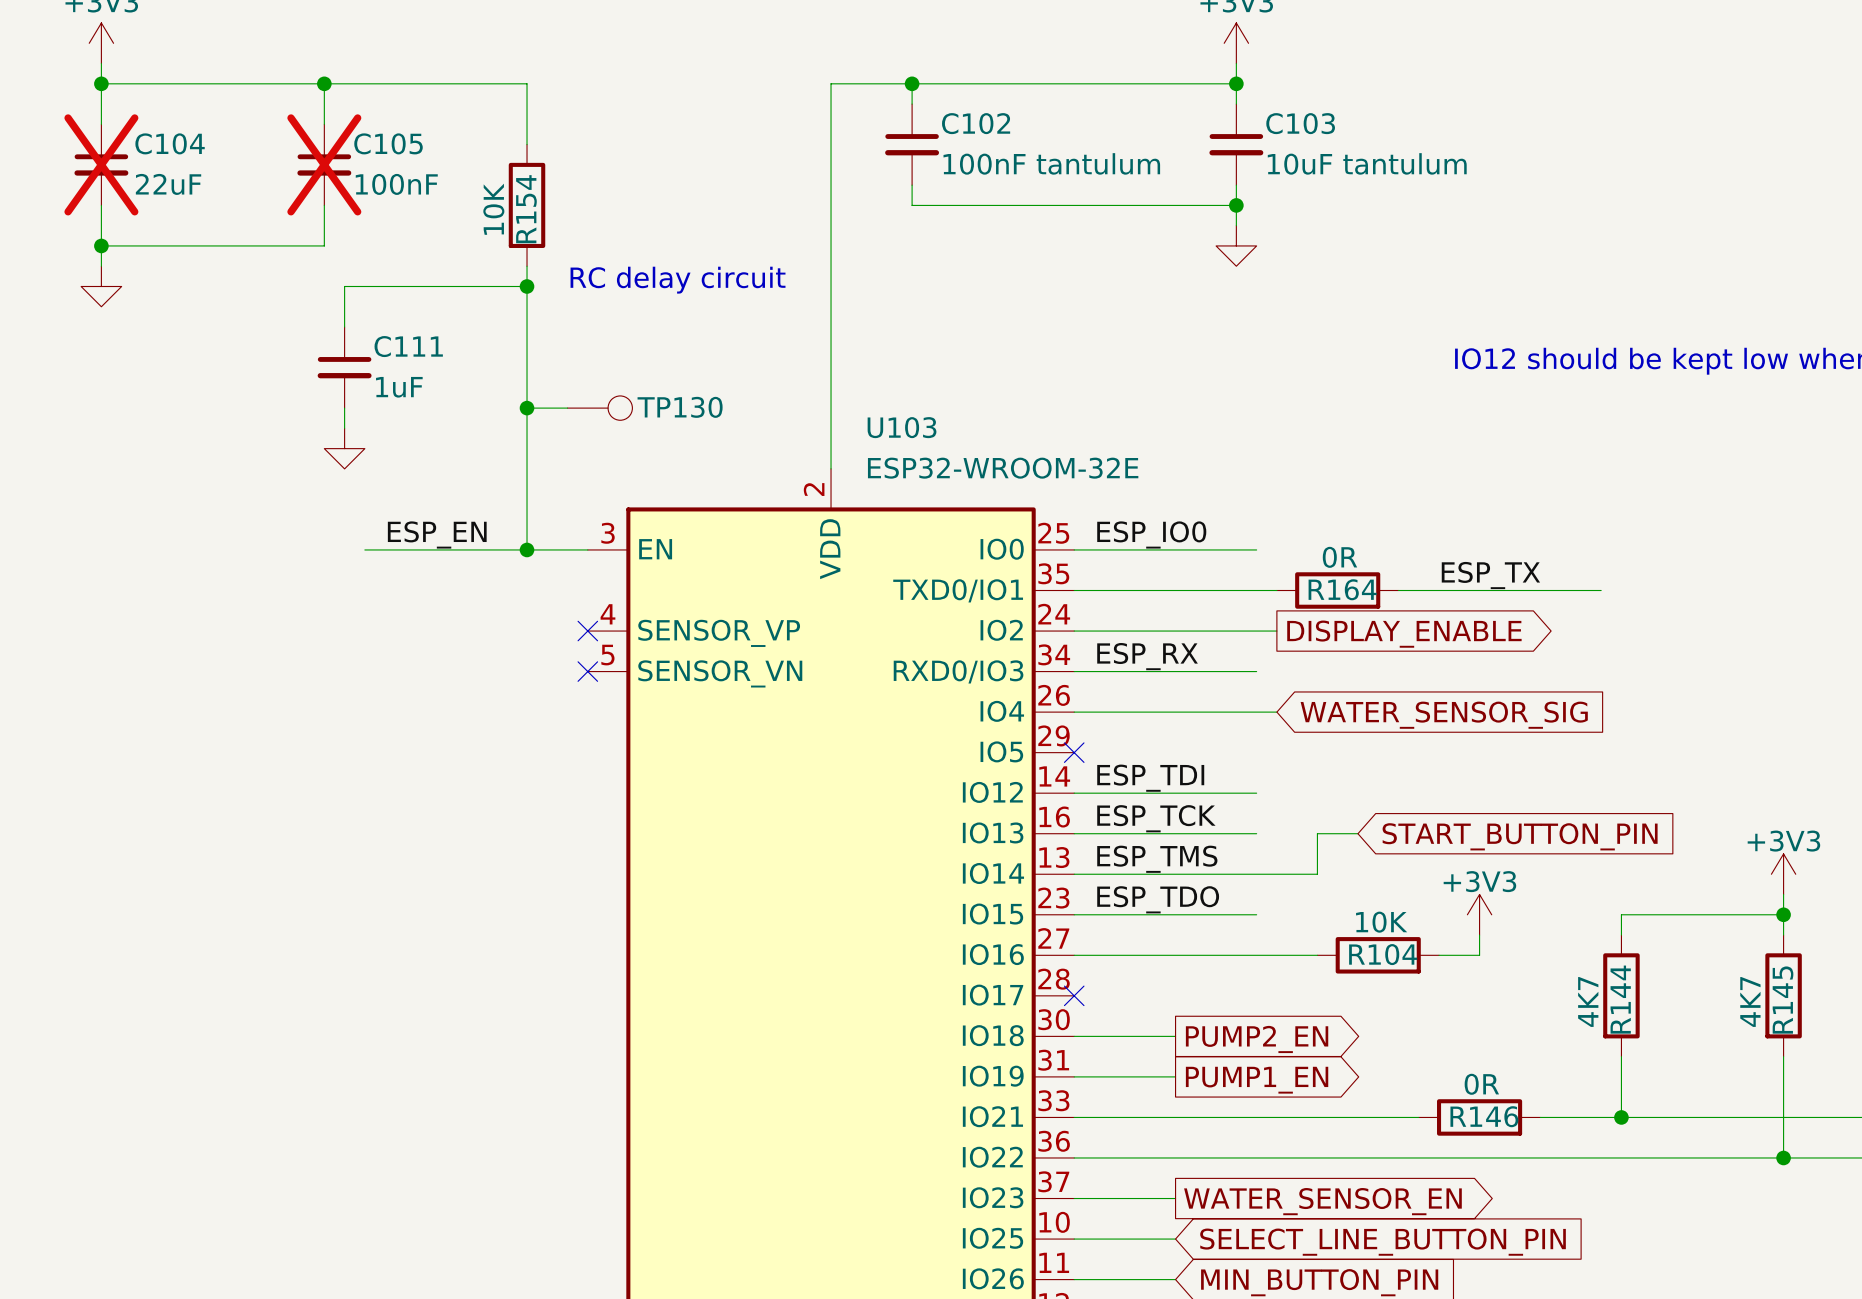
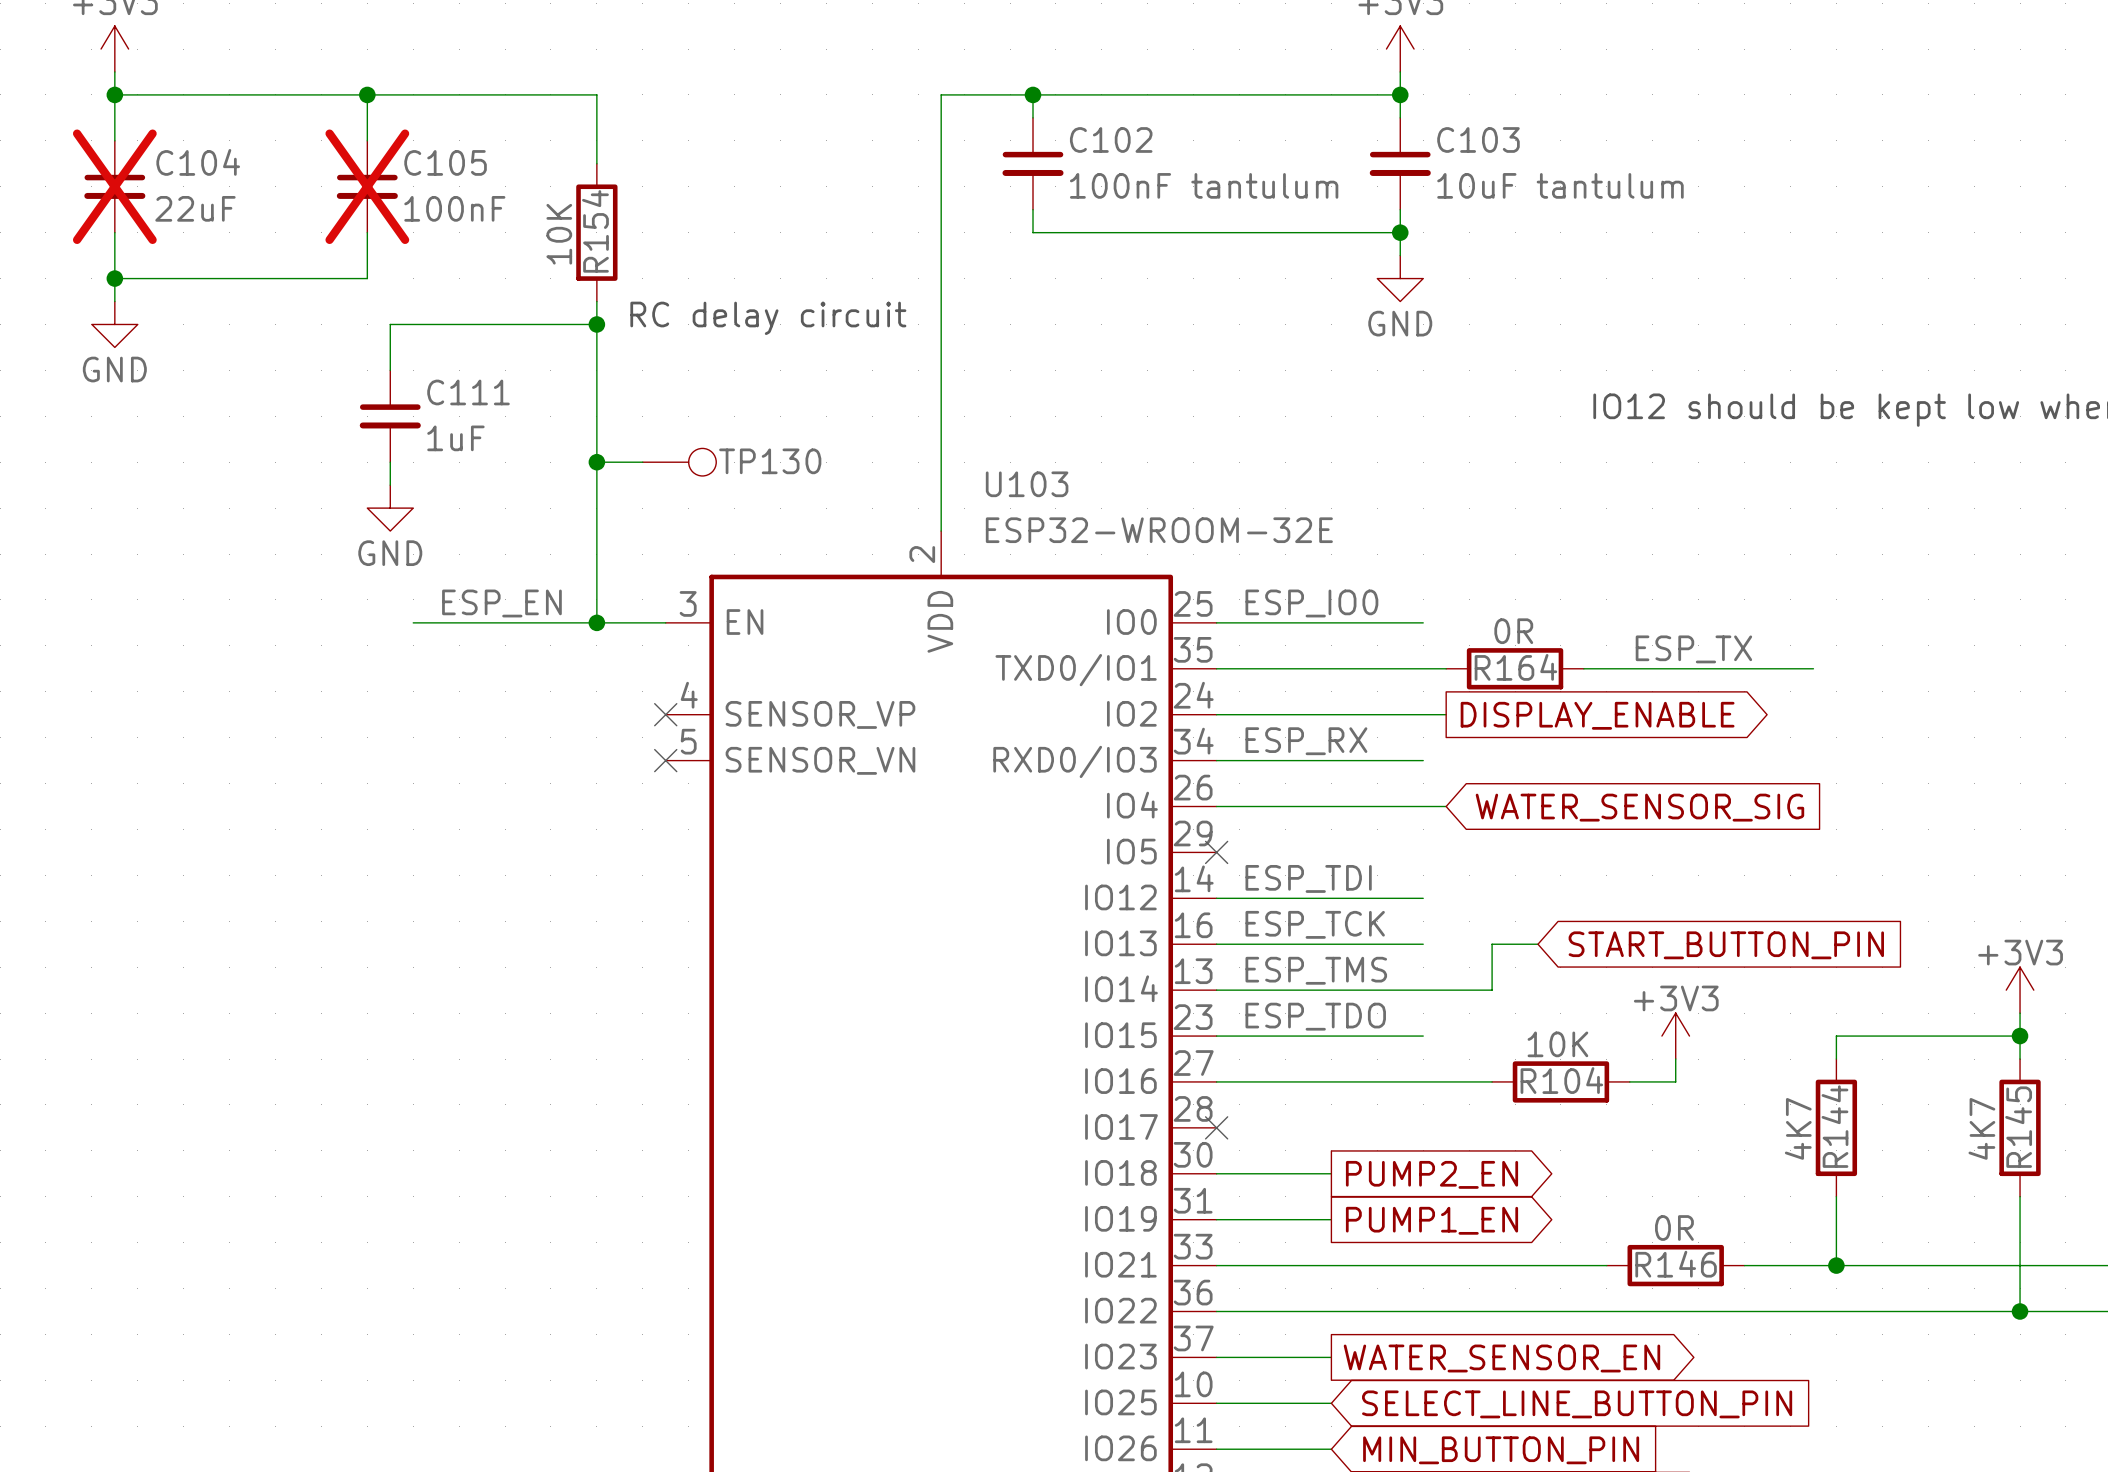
power symbol text: none -> GND (1400, 323)
power symbol text: none -> GND (114, 369)
power symbol text: none -> GND (390, 553)

